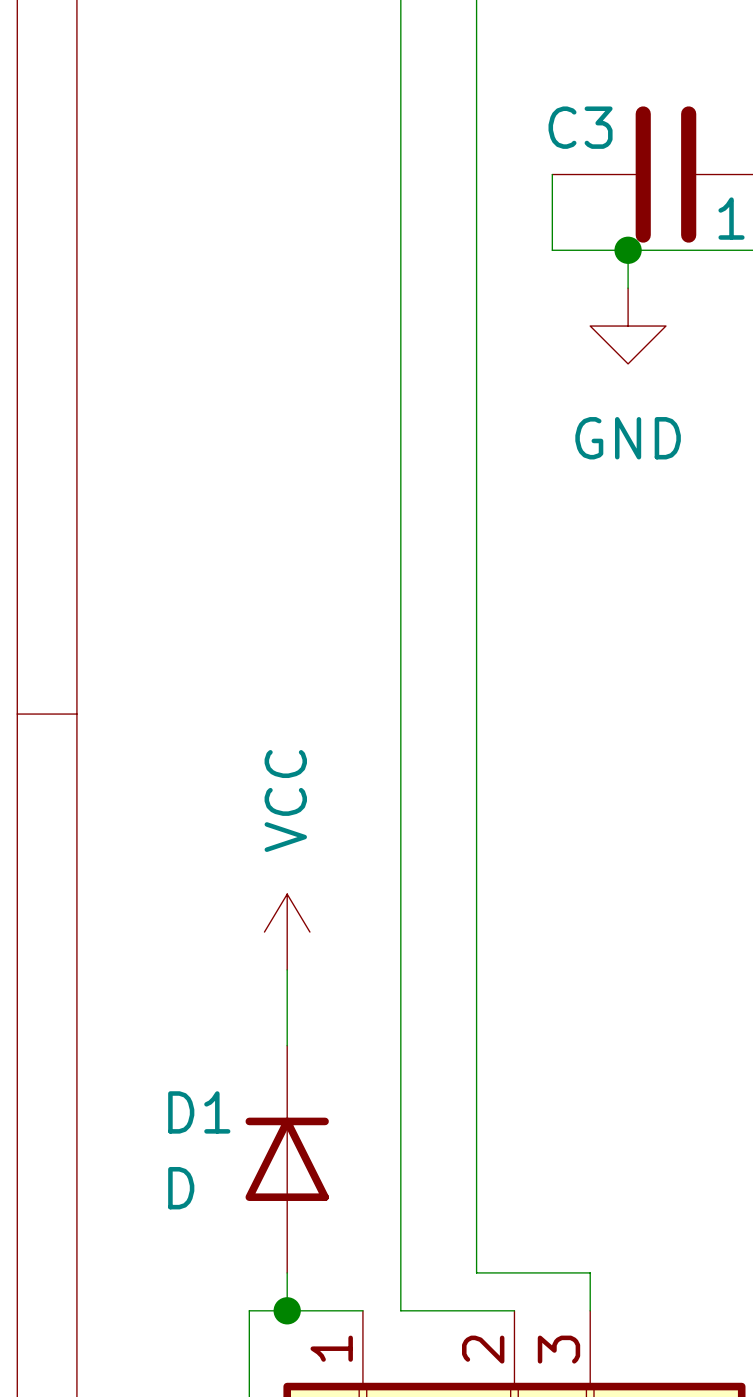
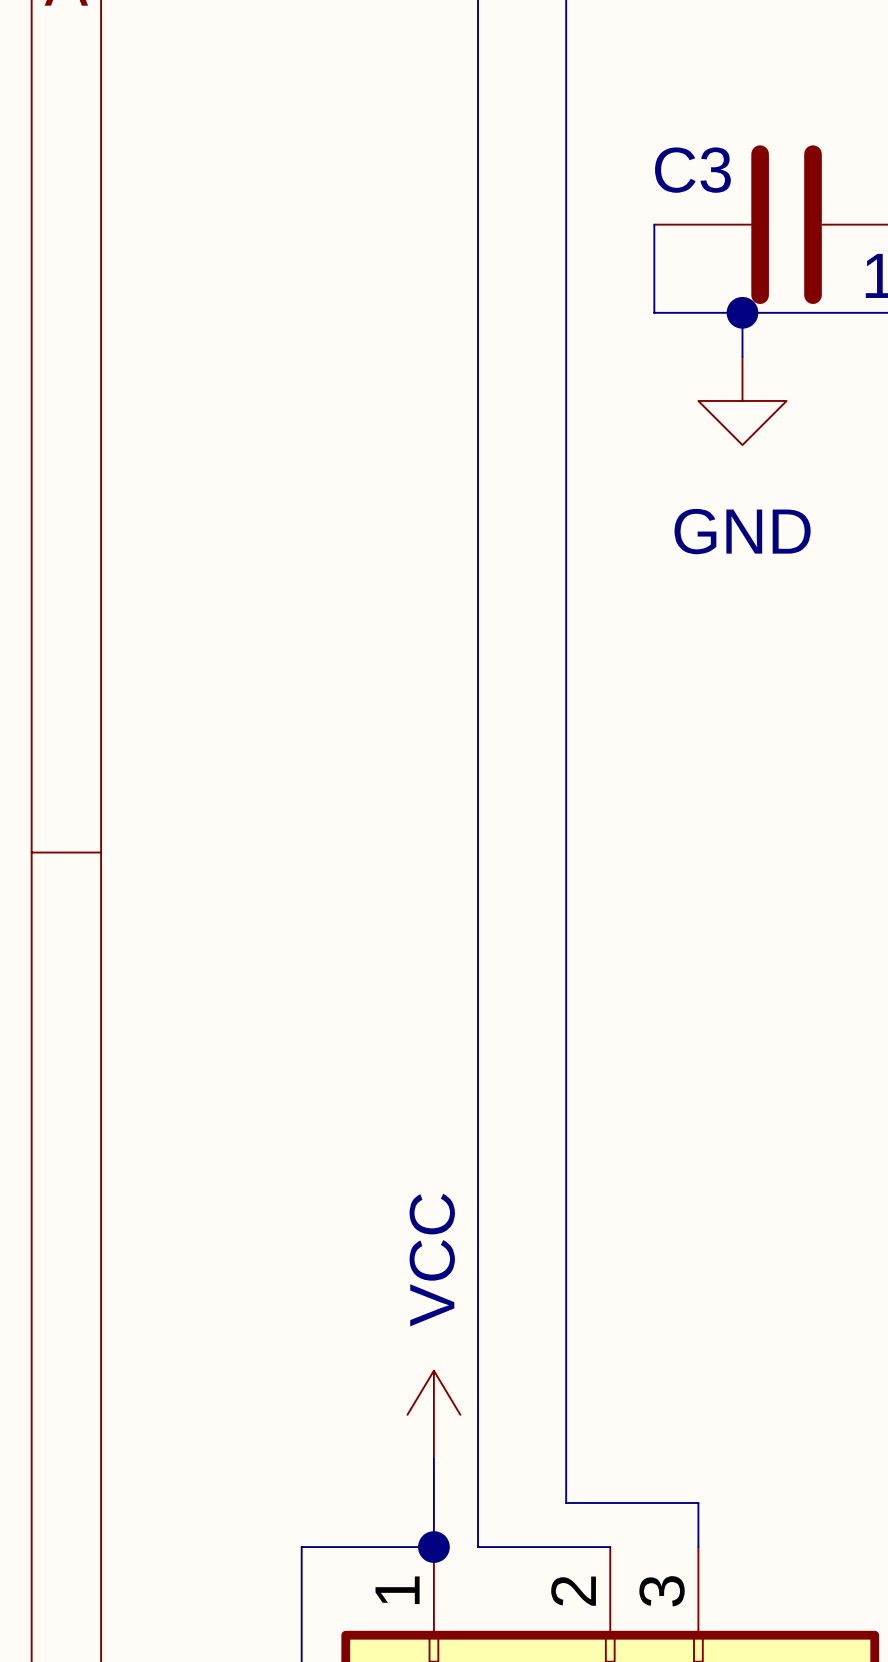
power symbol position: VCC (287, 932) -> VCC (433, 1414)
wire: (287, 969) (287, 1045) -> (433, 1458) (433, 1547)
D1: D (287, 1159) -> none
wire: (287, 1272) (287, 1310) -> none
junction position: (287, 1310) -> (433, 1547)

